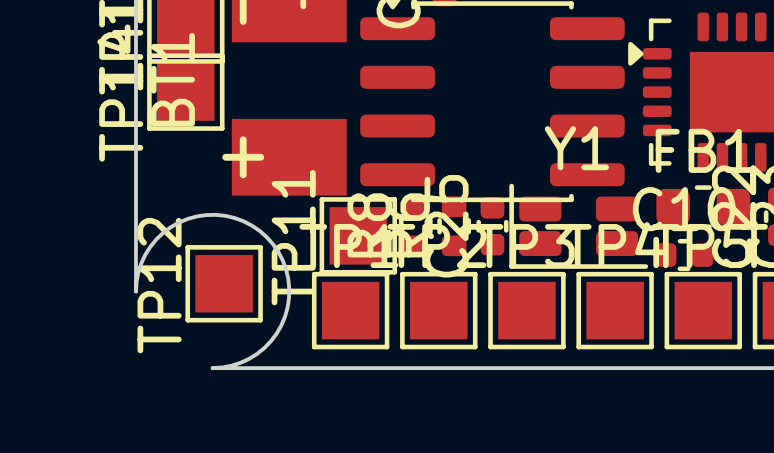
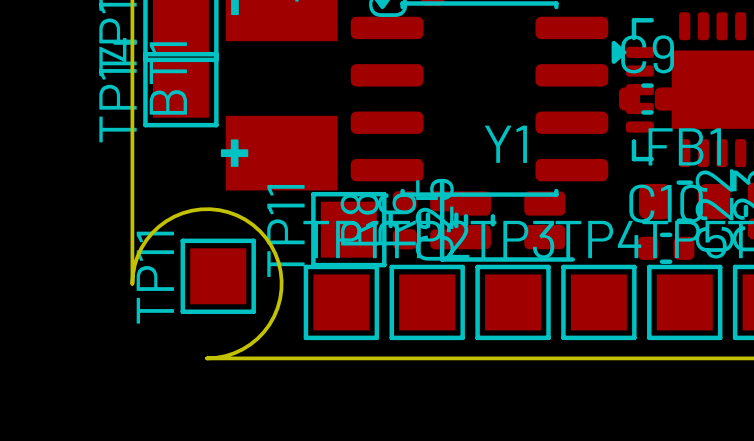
C9: none -> (647, 99)
Y1 position: (578, 226) -> (507, 220)
TP12 name: TP12 (159, 285) -> TP11 (155, 277)

